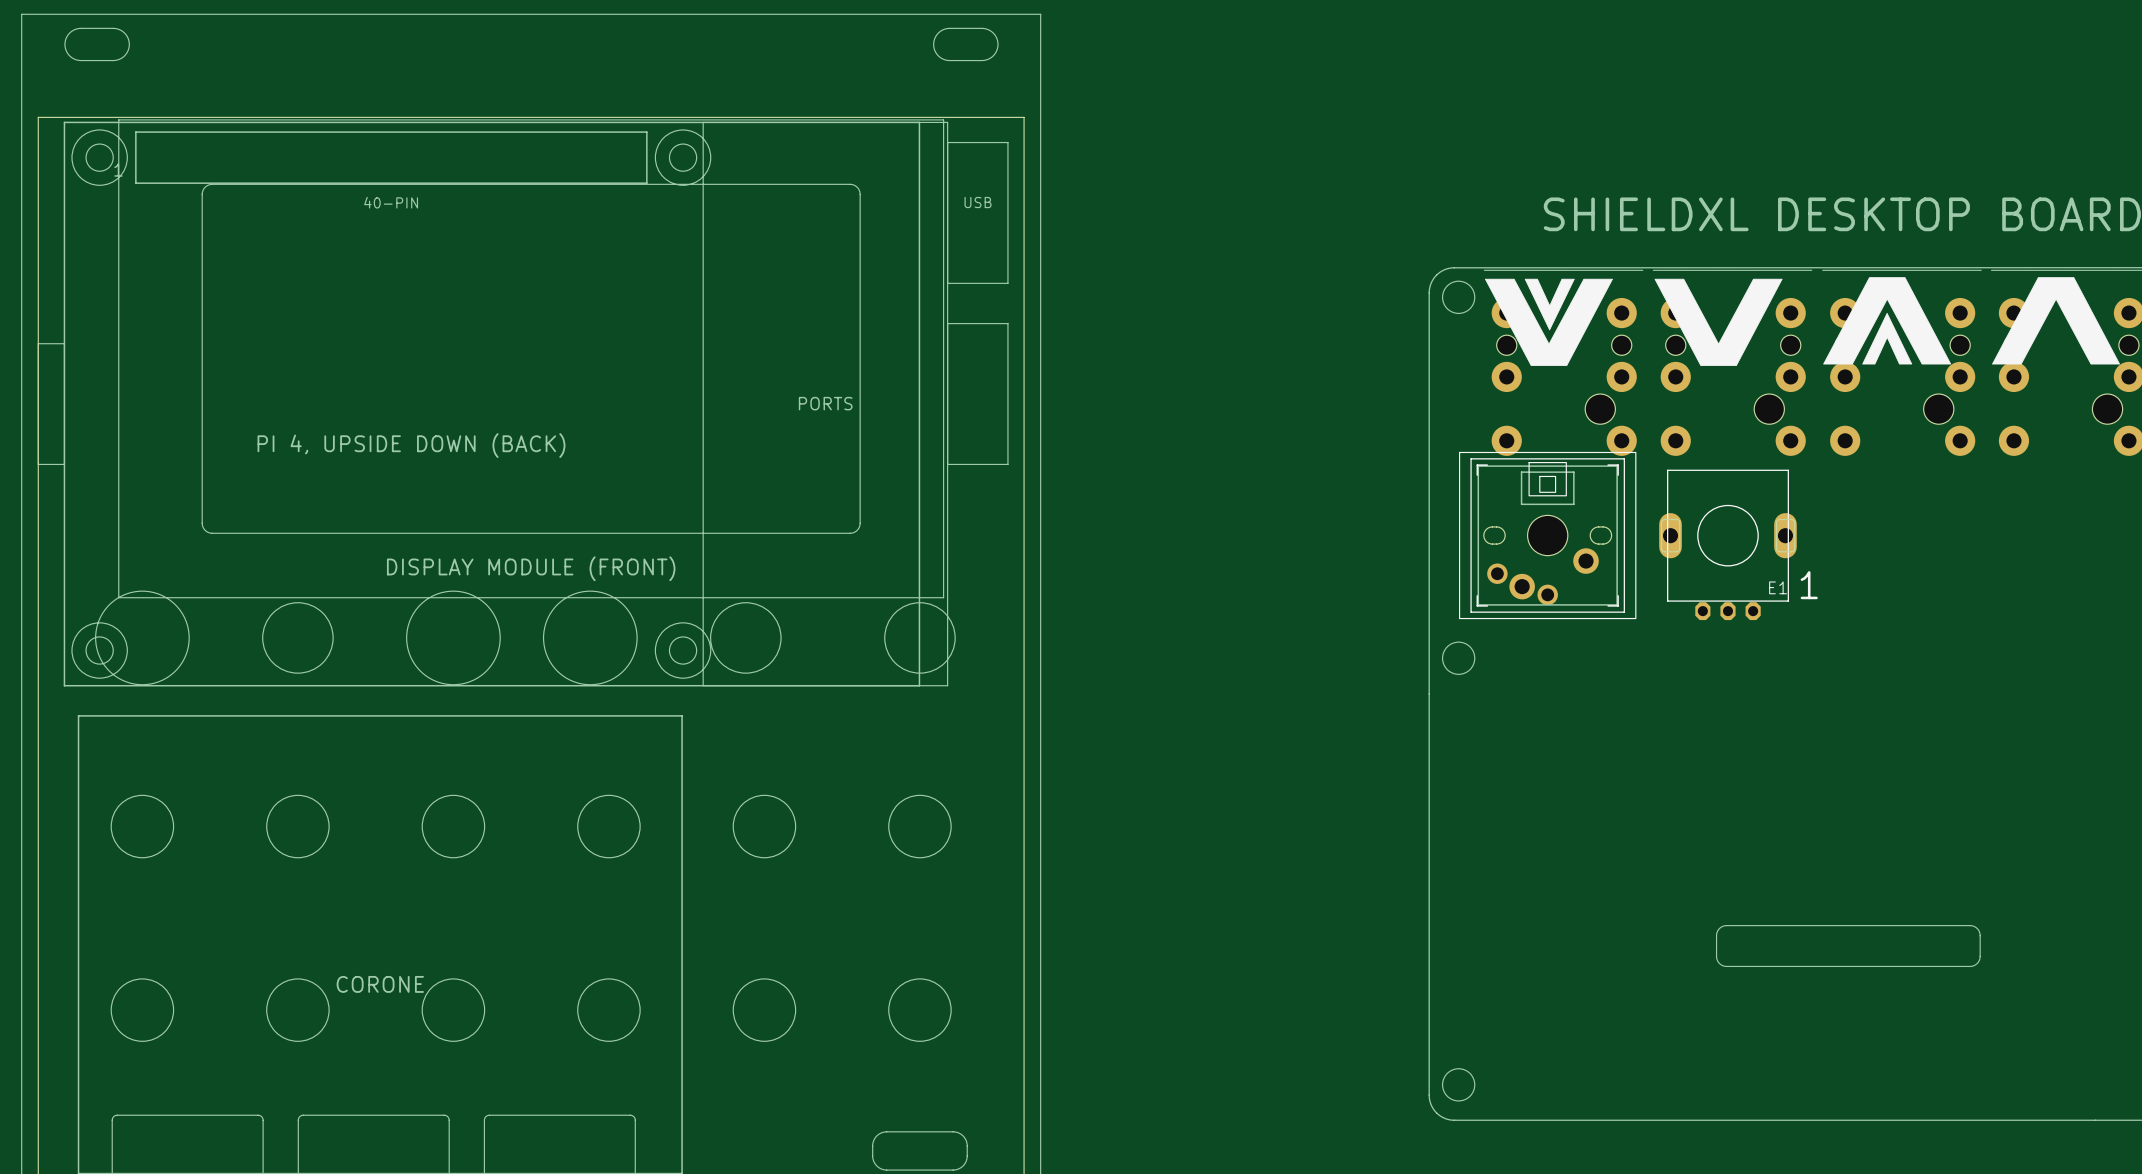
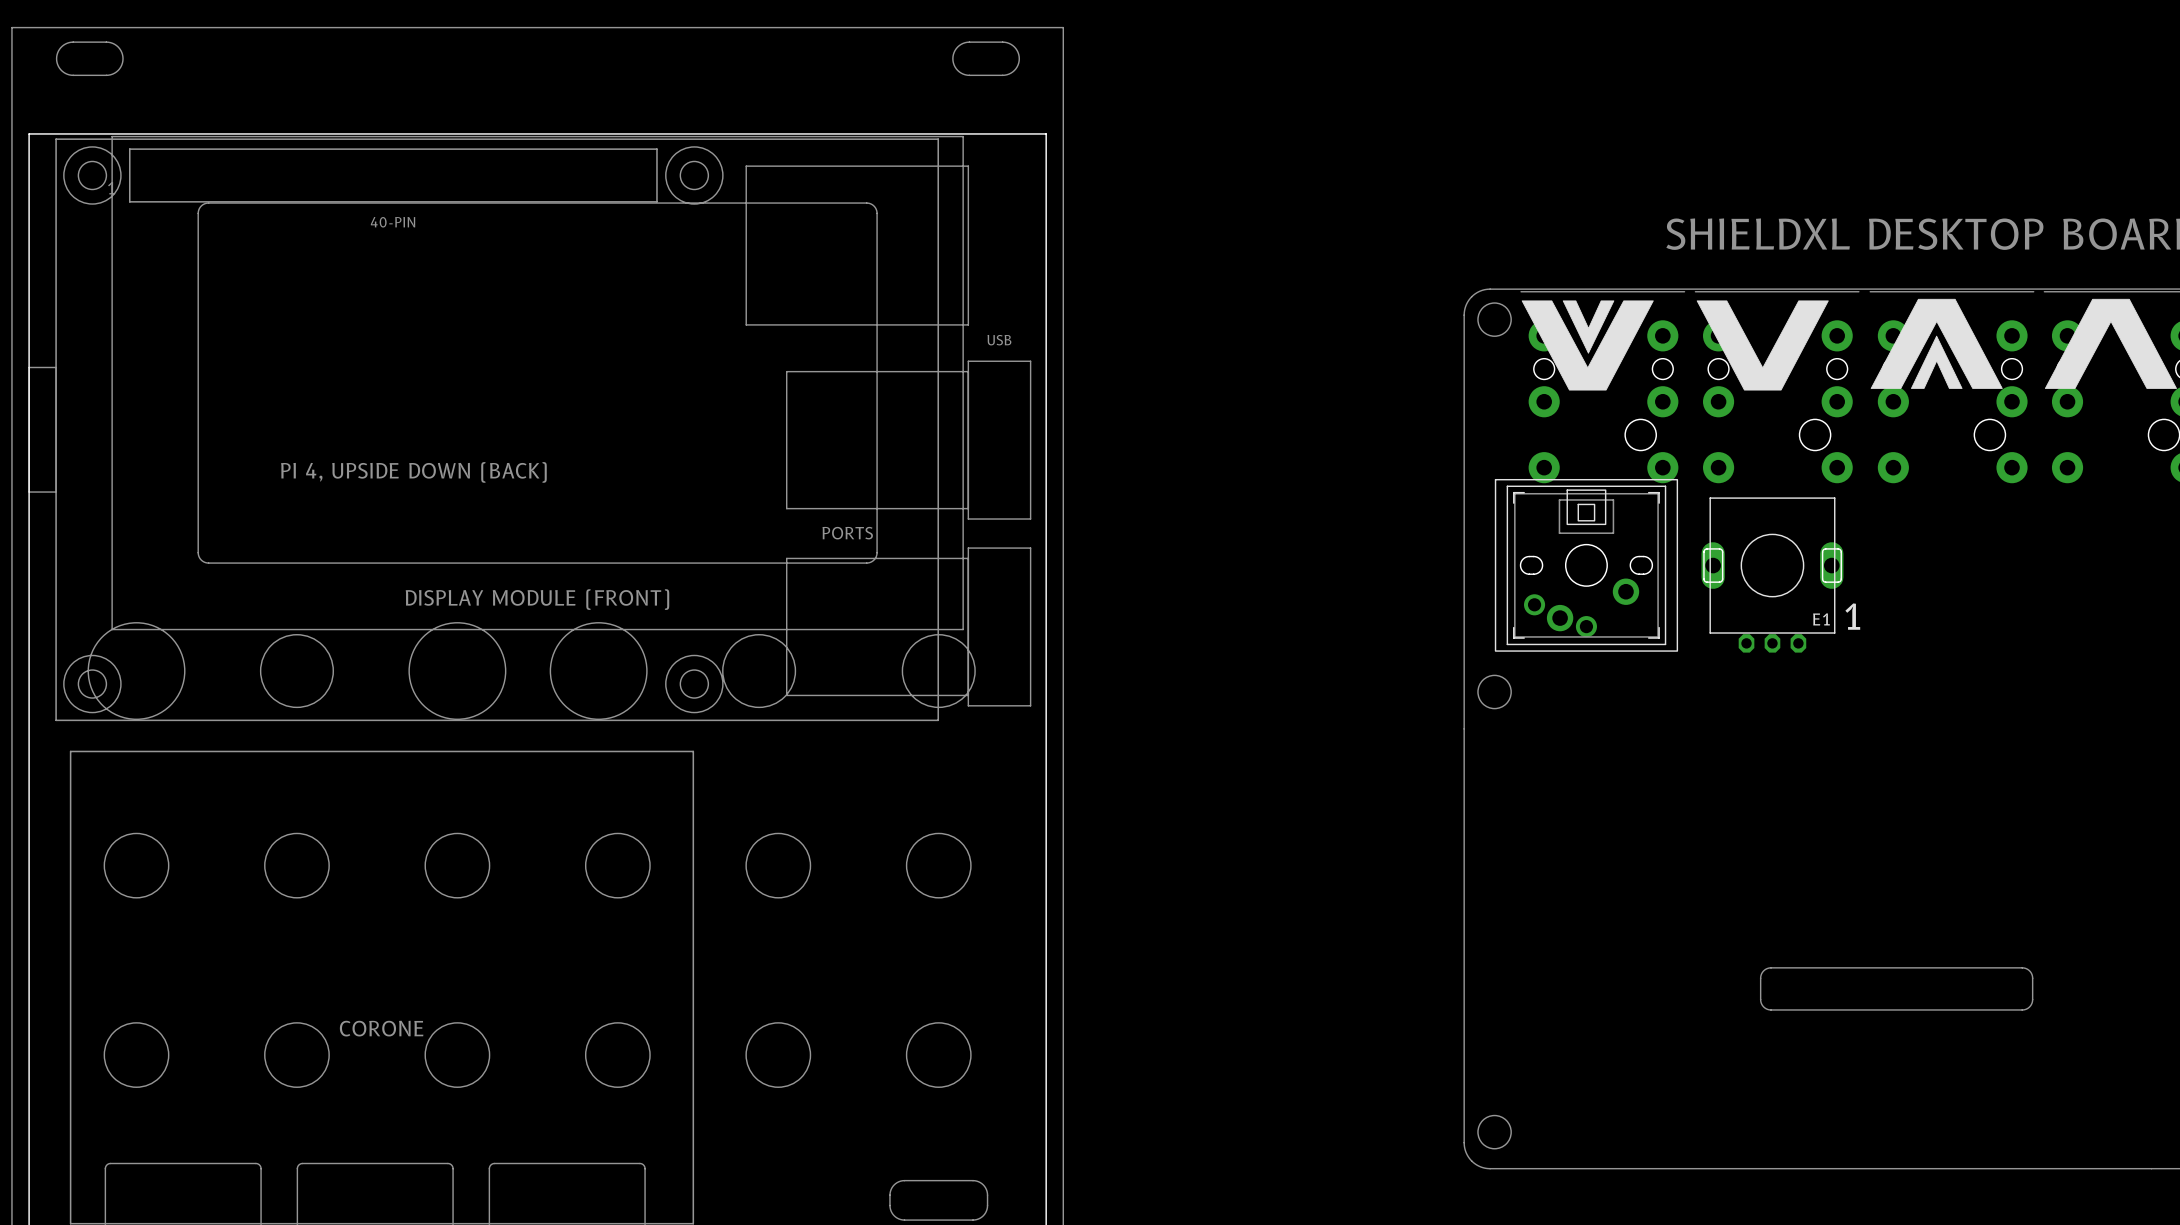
line: (703, 122) (947, 122) (947, 685) (703, 685) (703, 122) -> none
line: (947, 142) (1007, 142) (1007, 283) (947, 283) -> none
line: none -> (746, 166) (968, 166) (968, 324) (746, 324) (746, 166)
text position: USB (978, 202) -> USB (999, 340)
line: (947, 323) (1007, 323) (1007, 464) (947, 464) -> none
line: none -> (968, 361) (968, 519) (1030, 519) (1030, 361) (968, 361)
line: none -> (968, 371) (786, 371) (786, 508) (968, 508)
text position: PORTS (825, 403) -> PORTS (847, 533)
line: none -> (968, 548) (968, 705) (1030, 705) (1030, 548) (968, 548)
line: none -> (968, 558) (786, 558) (786, 695) (968, 695)

